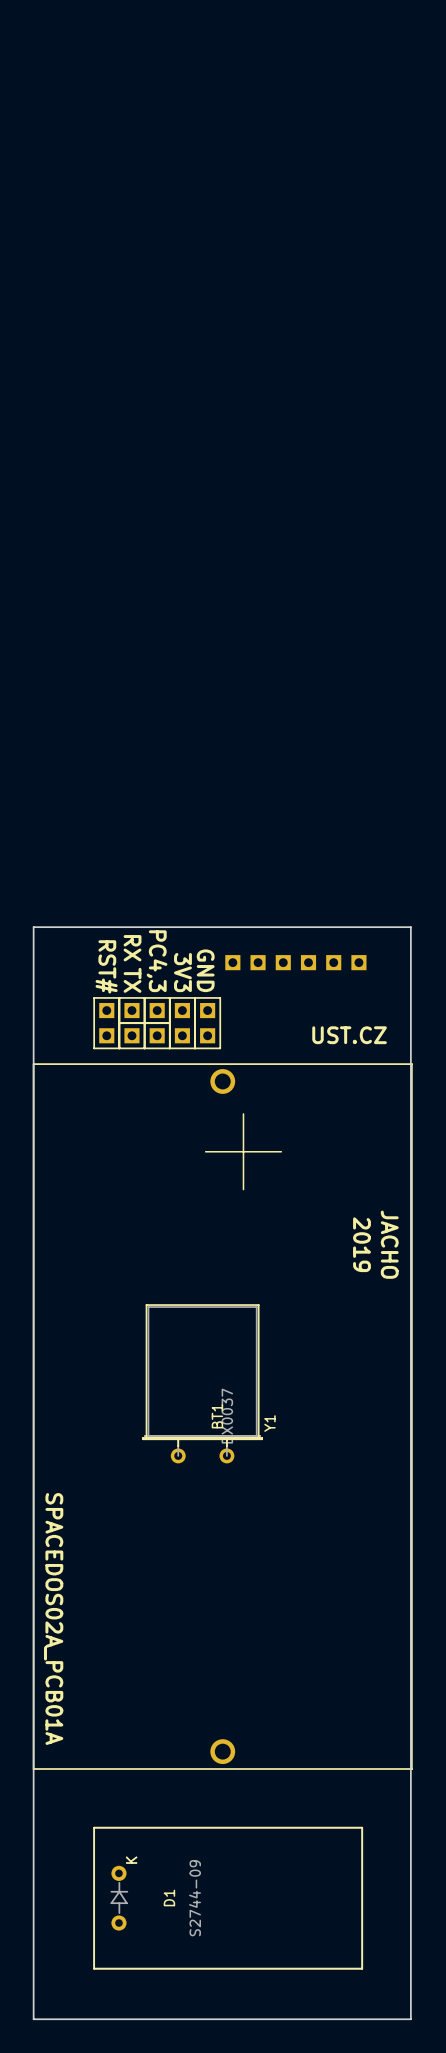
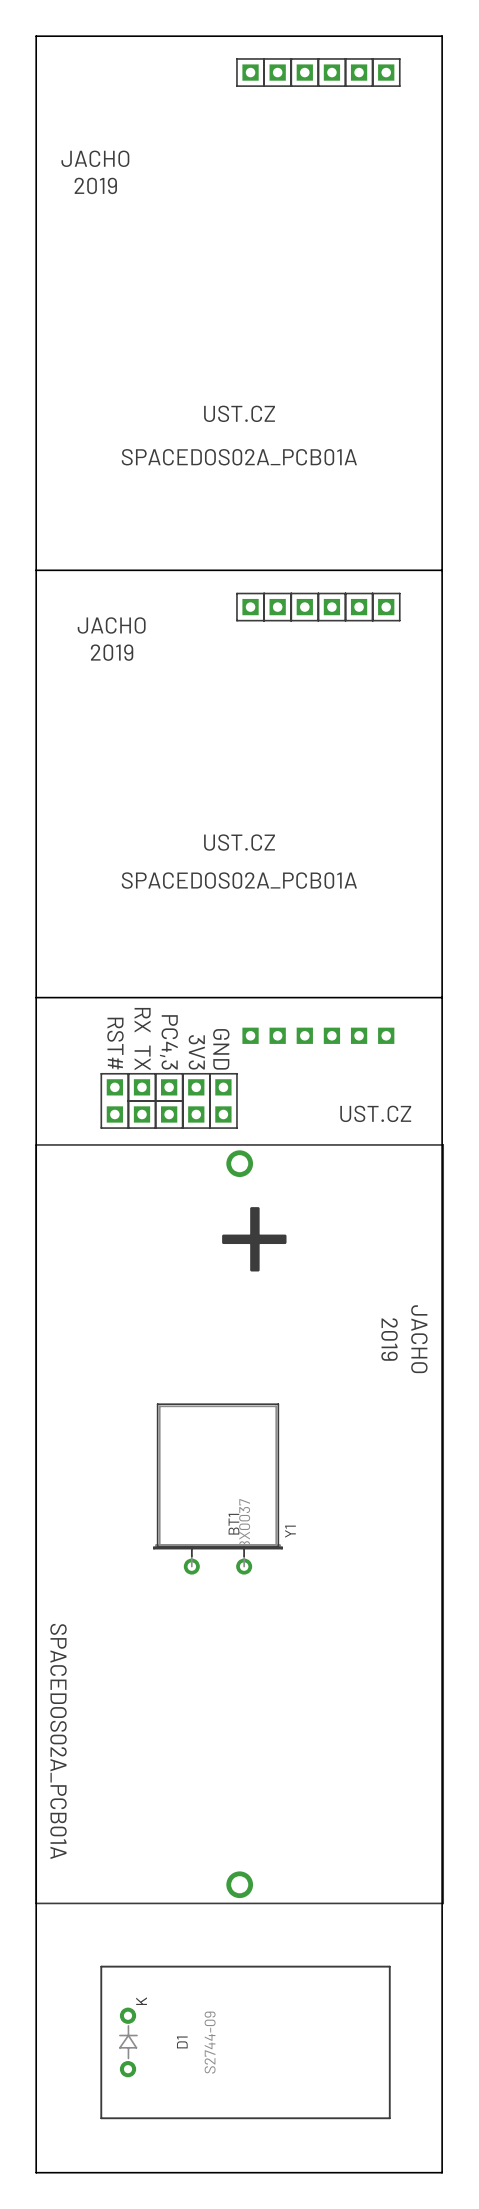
part: none -> (250, 72)
part: none -> (277, 72)
part: none -> (304, 72)
part: none -> (331, 72)
part: none -> (359, 72)
part: none -> (386, 72)
text: none -> JACHO (95, 158)
text: none -> 2019 (95, 185)
text: none -> UST.CZ (239, 413)
text: none -> SPACEDOS02A_PCB01A (239, 457)
board edge: none -> (36, 570) (442, 570)
part: none -> (250, 607)
part: none -> (277, 607)
part: none -> (304, 607)
part: none -> (331, 607)
part: none -> (359, 607)
part: none -> (386, 607)
text: none -> JACHO (111, 625)
text: none -> 2019 (112, 652)
text: none -> UST.CZ (239, 842)
text: none -> SPACEDOS02A_PCB01A (239, 880)
board edge: none -> (36, 997) (36, 36) (442, 36) (442, 997)

